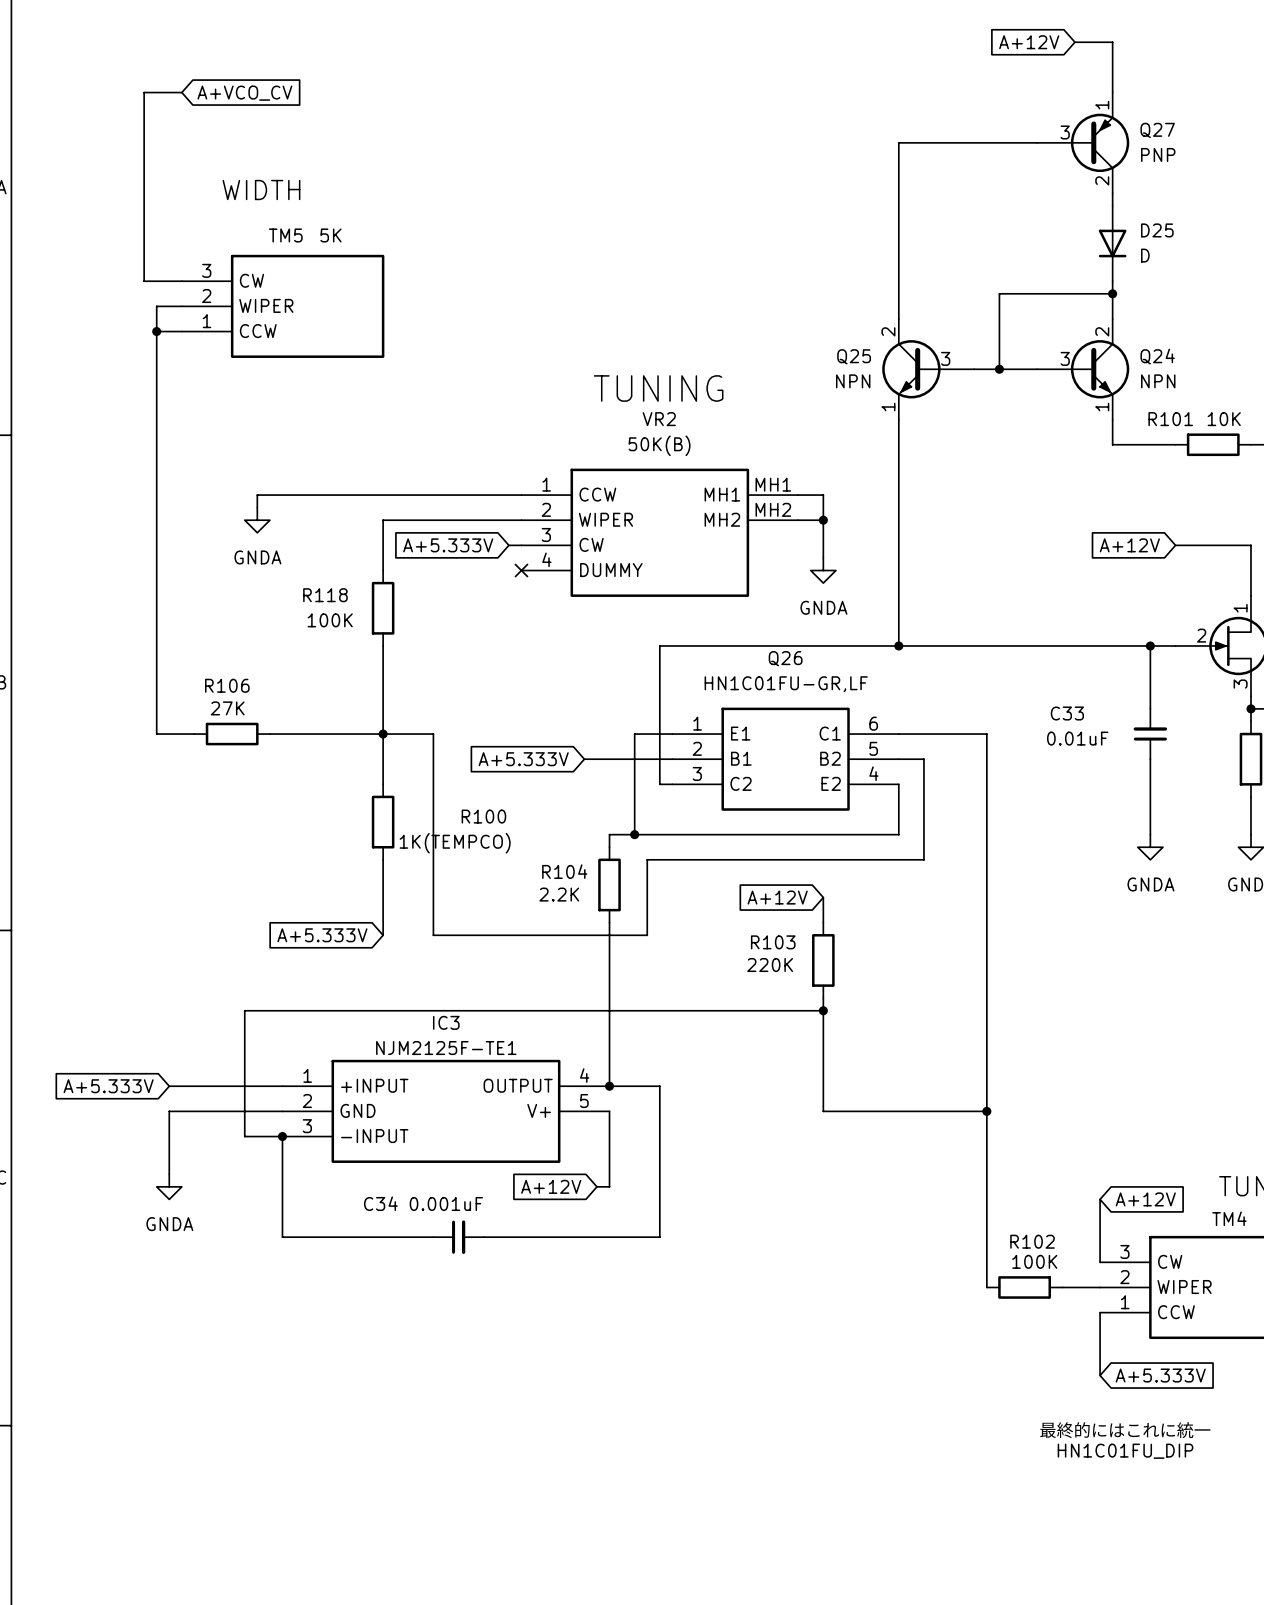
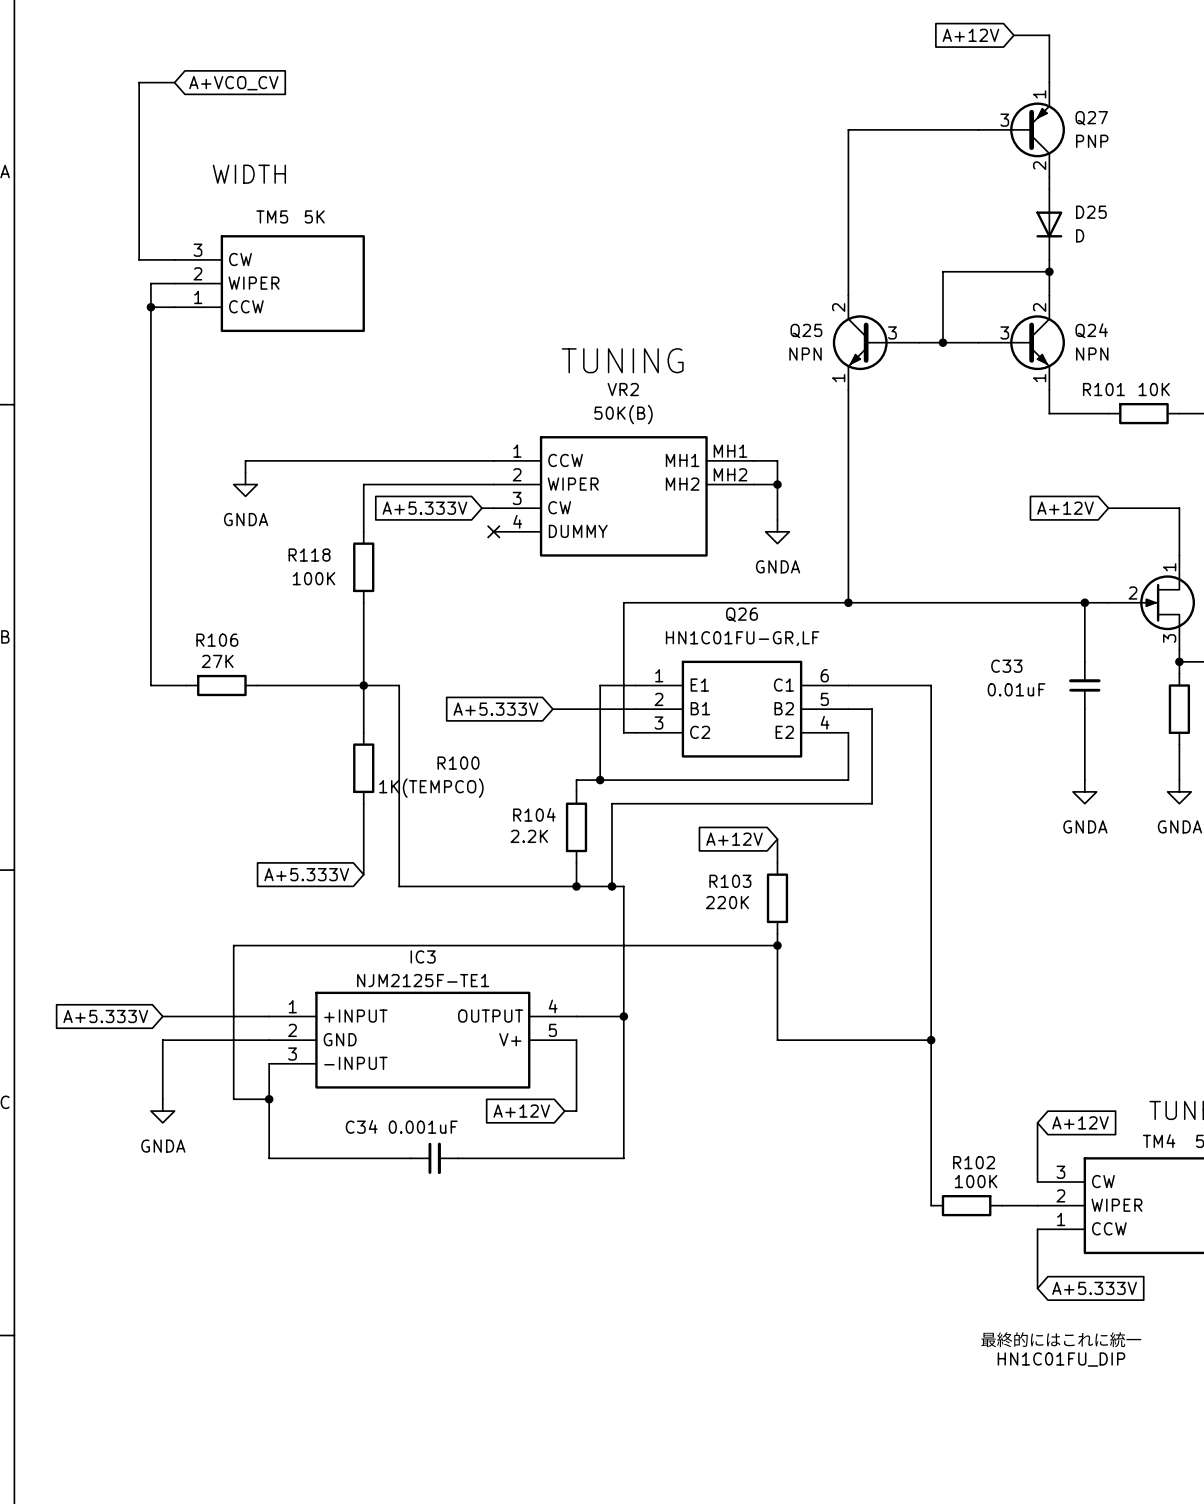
wire: (420, 734) (433, 734) (433, 935) (647, 935) -> (399, 685) (399, 886) (623, 886) (623, 1016)
wire: none -> (611, 874) (611, 886)
wire: (609, 947) (609, 1086) -> none
junction: none -> (576, 886)
junction: none -> (611, 886)
junction position: (609, 1086) -> (623, 1016)
wire: (244, 1136) (282, 1136) -> (233, 1063) (233, 1099) (269, 1099)
junction position: (282, 1136) -> (269, 1099)

